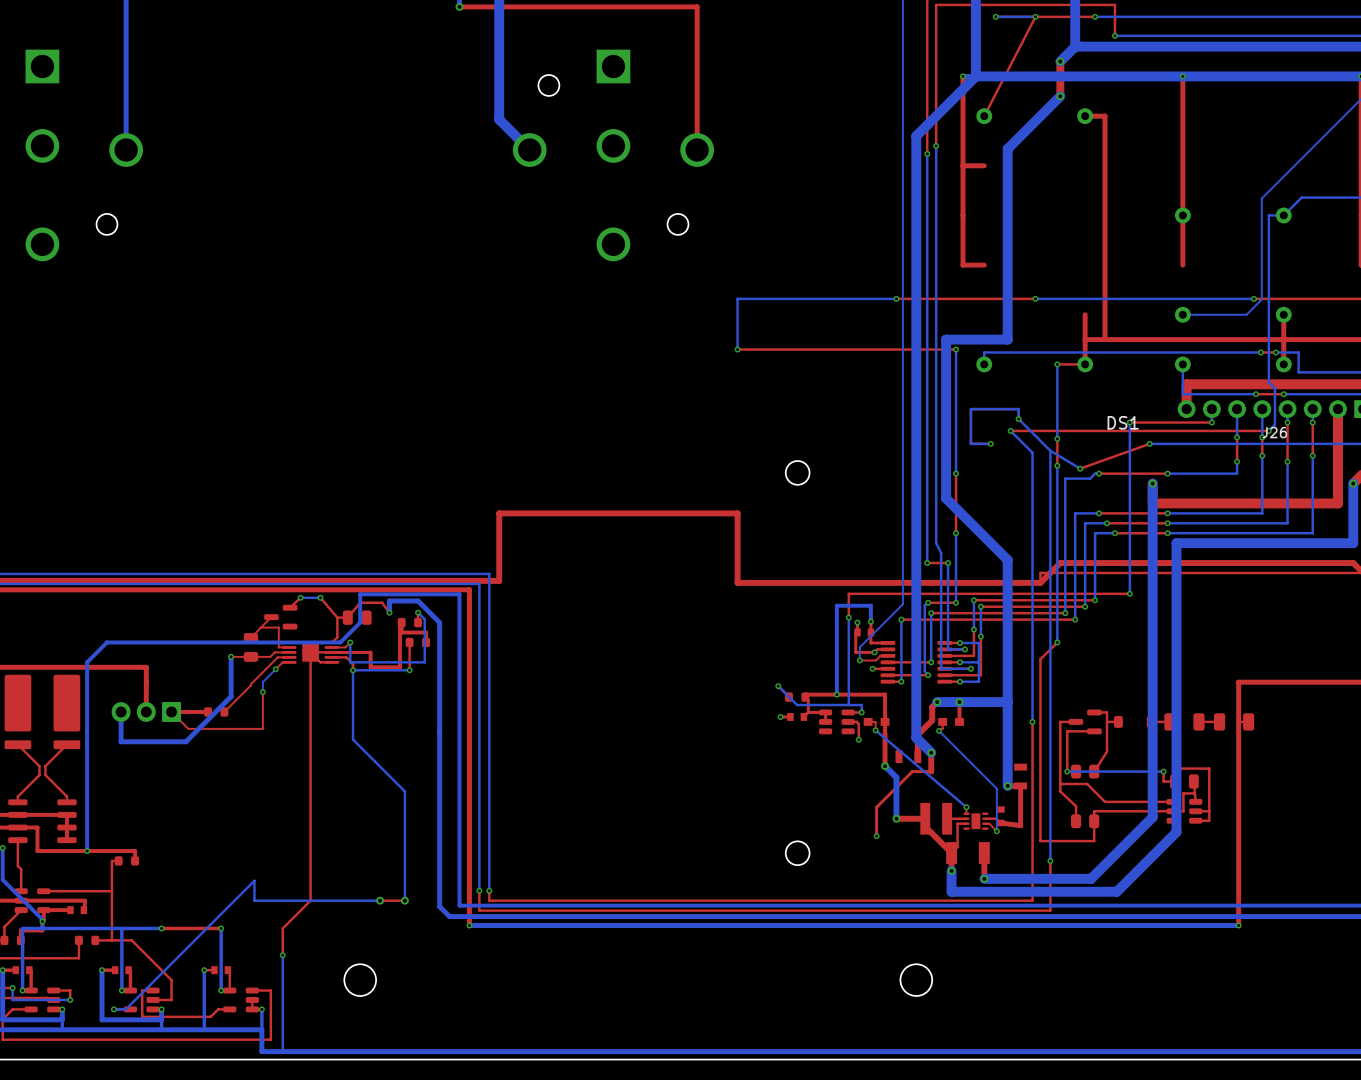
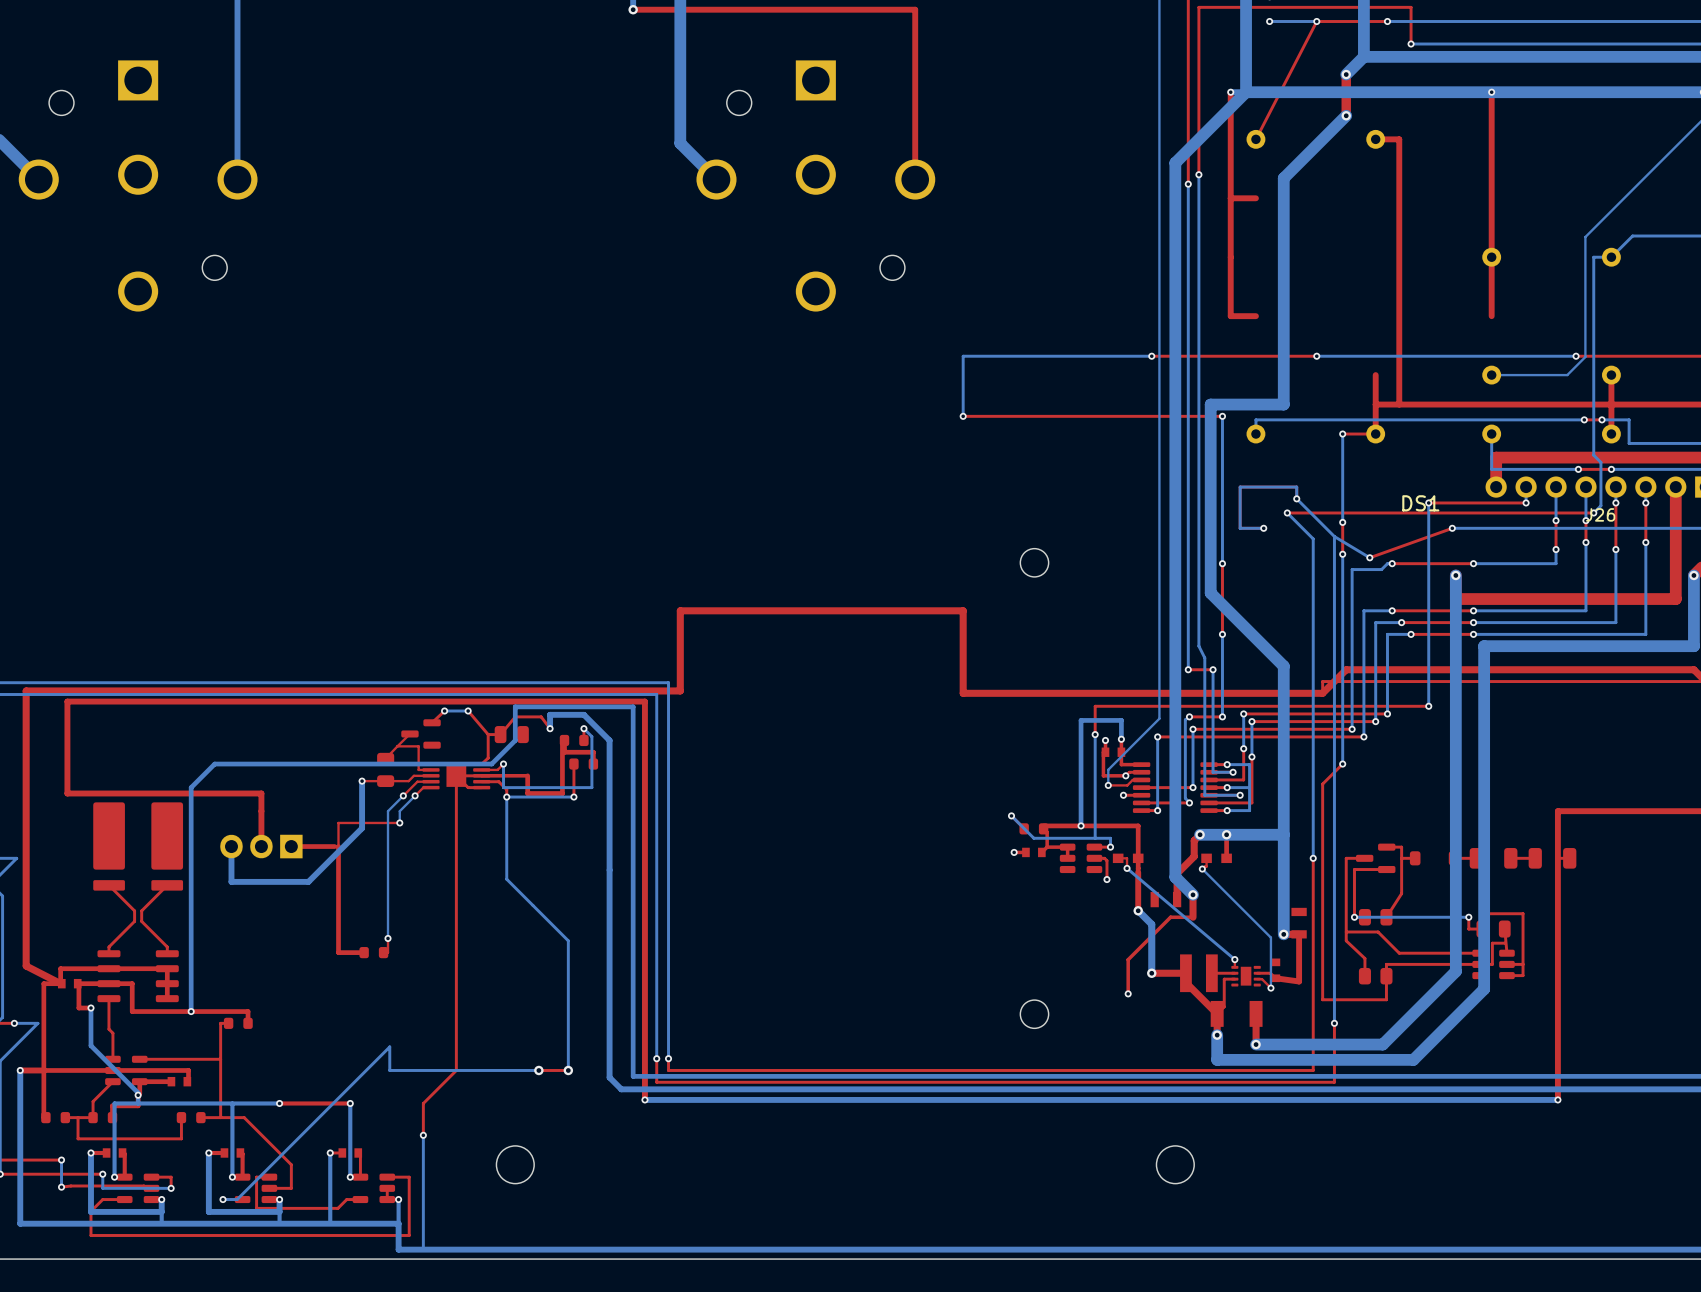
top track: (265, 669) (224, 711) -> none
bottom track: none -> (403, 795) (388, 811) (388, 938)
via: none -> (403, 795)
top track: (262, 692) (262, 728) (188, 728) (171, 711) -> (399, 822) (338, 822) (338, 952) (364, 952)
part position: (216, 711) -> (373, 952)
top track: none -> (388, 938) (388, 952) (383, 952)
via: none -> (388, 938)

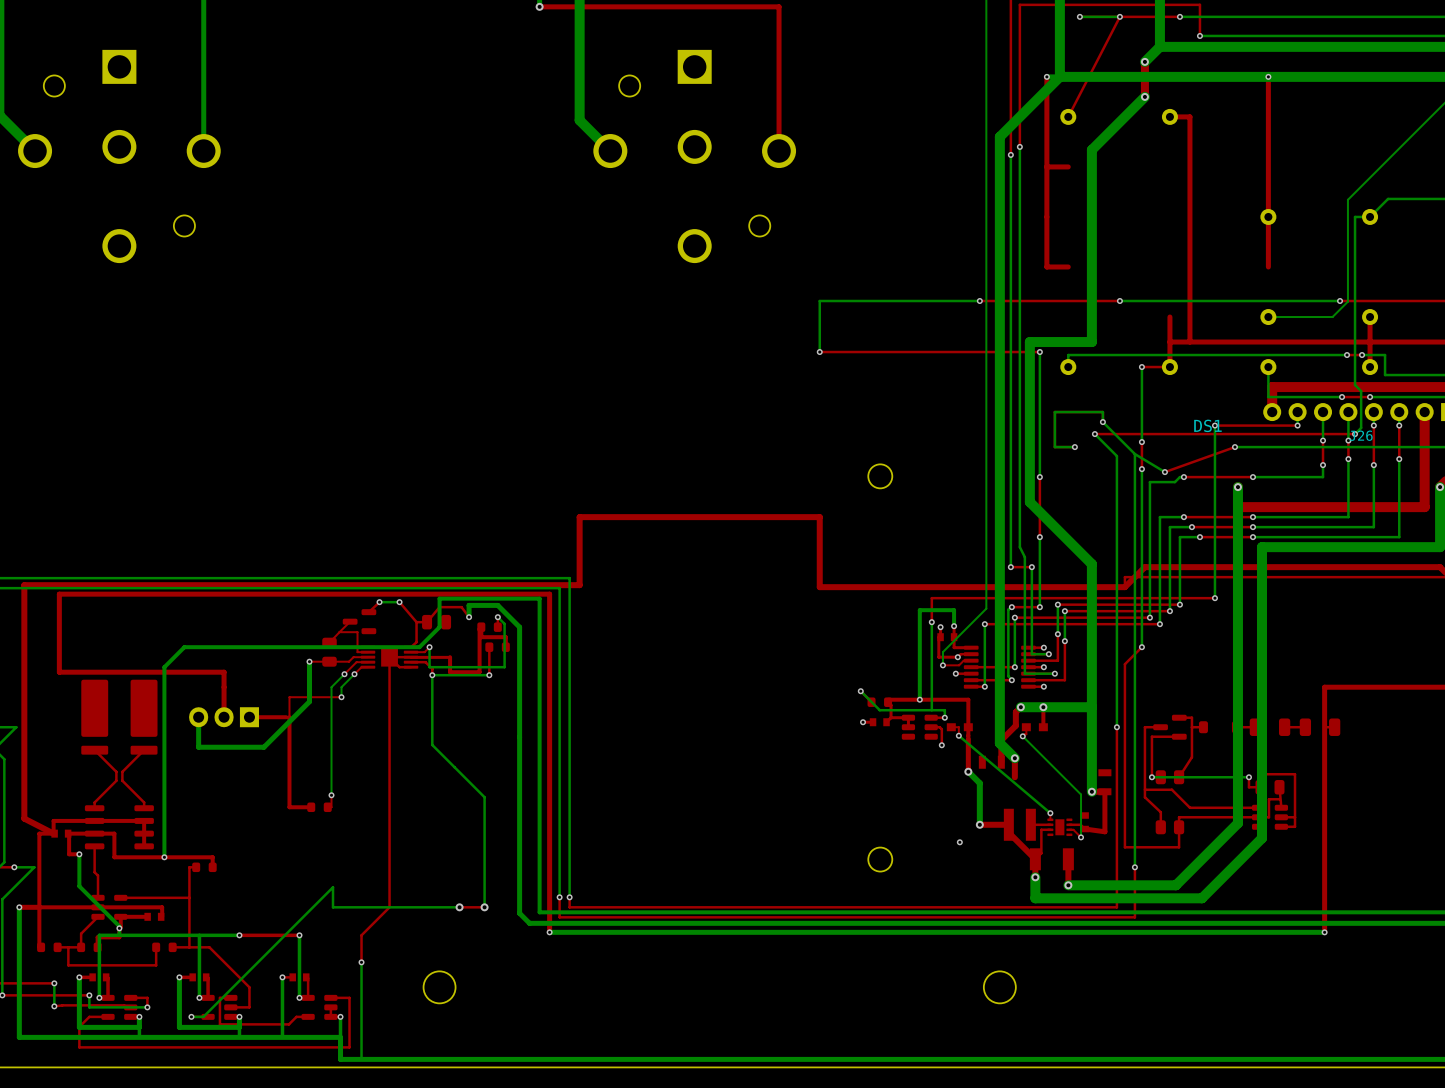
bottom track: (1227, 764) (1249, 764) (1249, 810) (1227, 810) -> none
bottom track: (1249, 787) (1227, 787) -> none
top track: (1193, 917) (1170, 917) (1128, 959) (1128, 993) -> none

